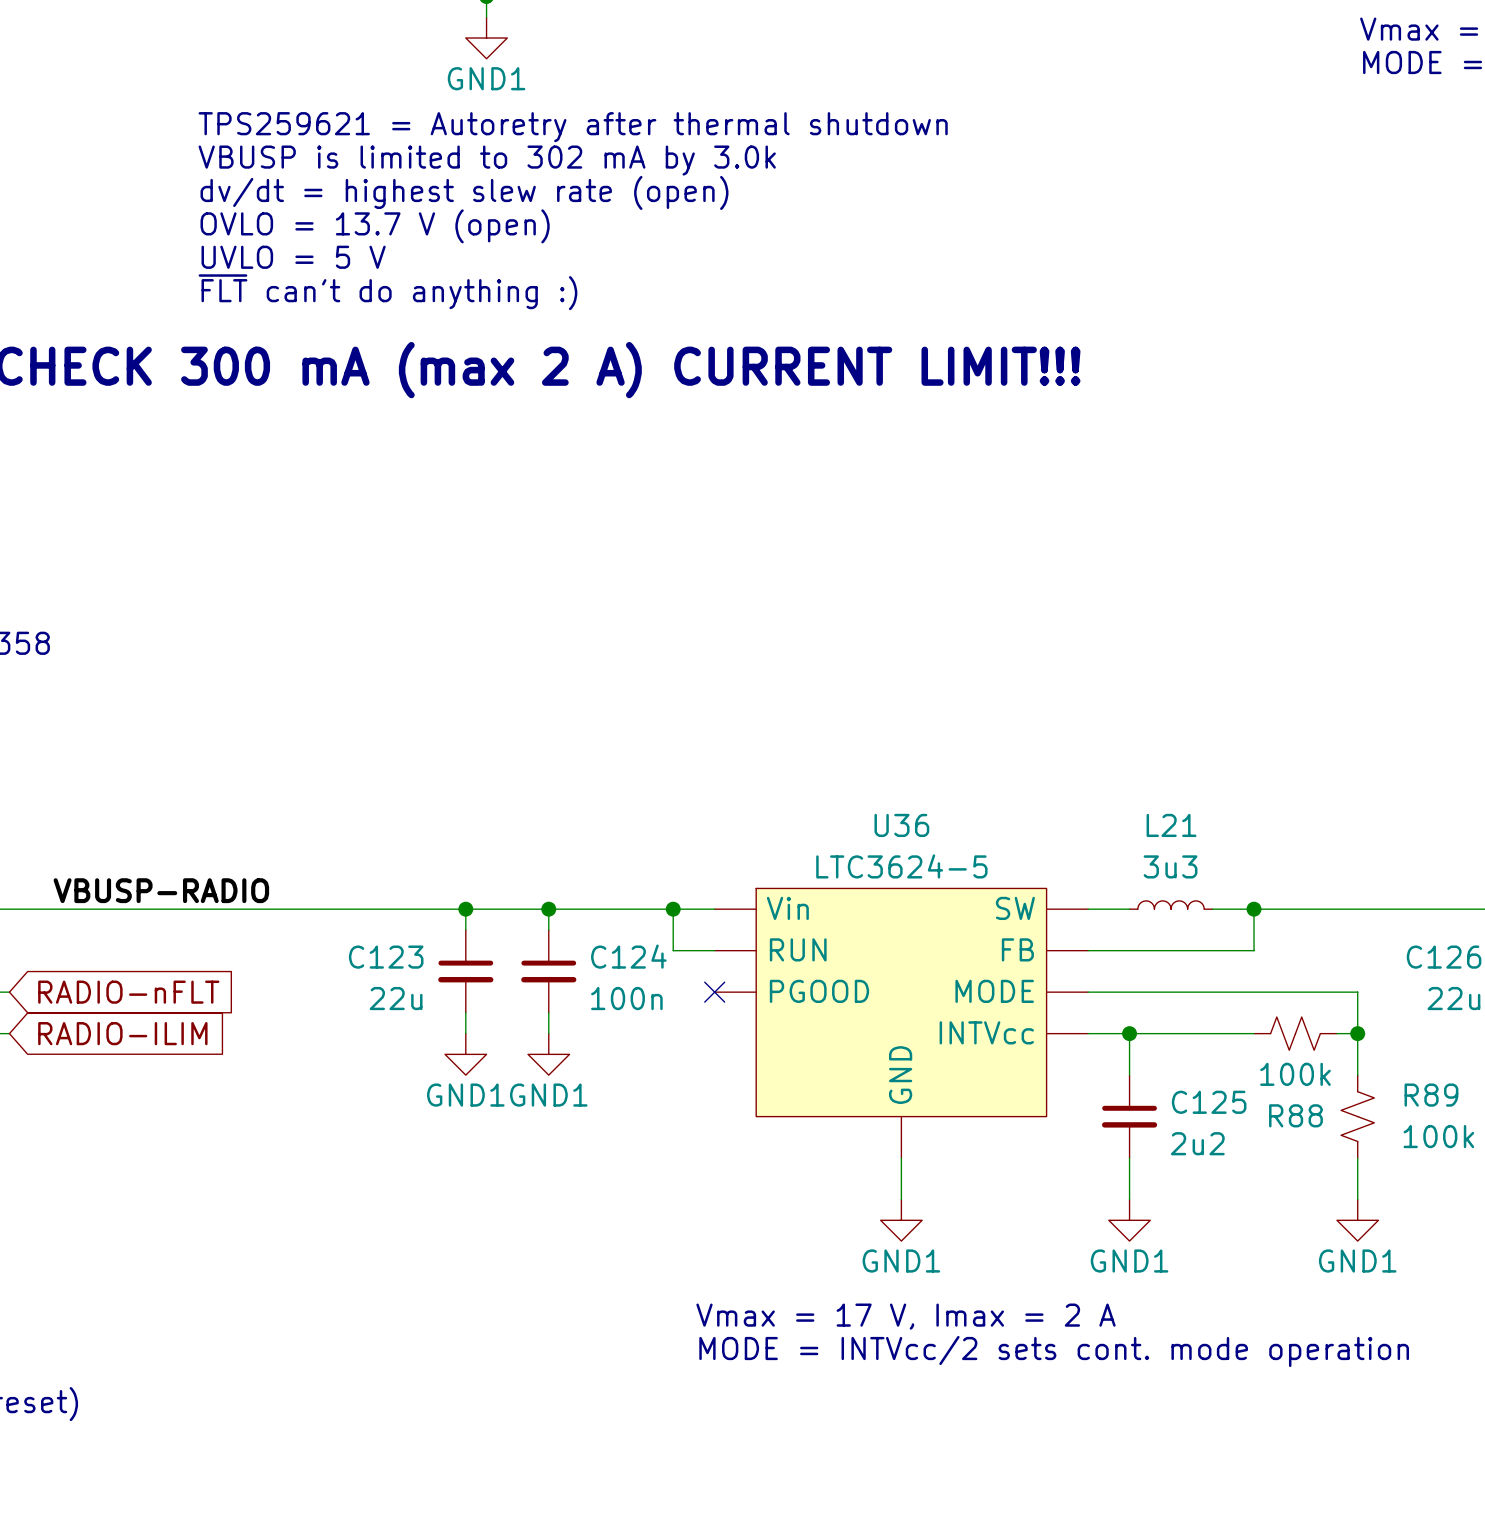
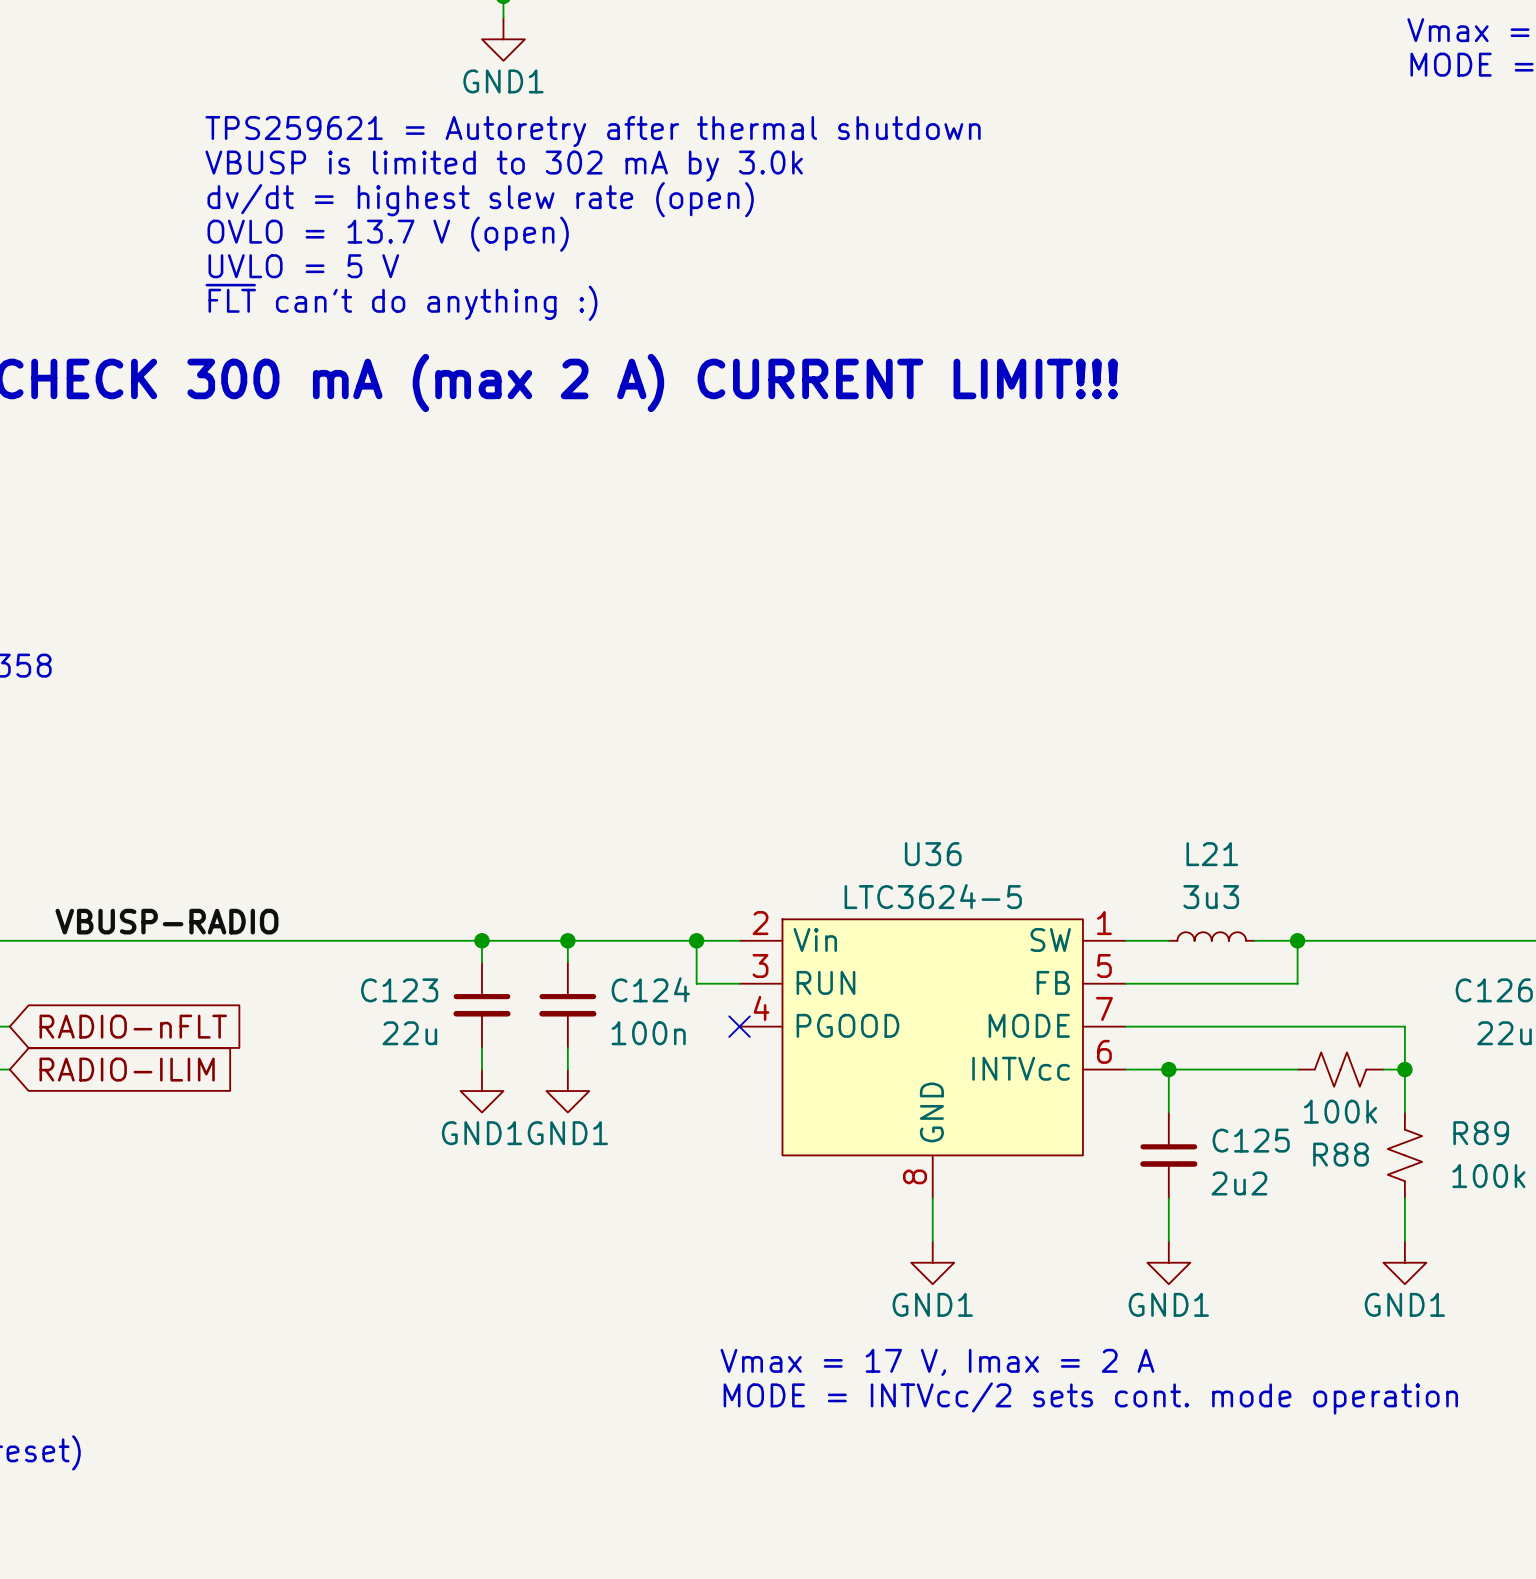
U36 pin number: none -> 2 (760, 923)
U36 pin number: none -> 1 (1104, 923)
U36 pin number: none -> 3 (760, 966)
U36 pin number: none -> 5 (1104, 966)
U36 pin number: none -> 4 (761, 1008)
U36 pin number: none -> 7 (1104, 1008)
U36 pin number: none -> 6 (1104, 1051)
U36 pin number: none -> 8 (915, 1176)

